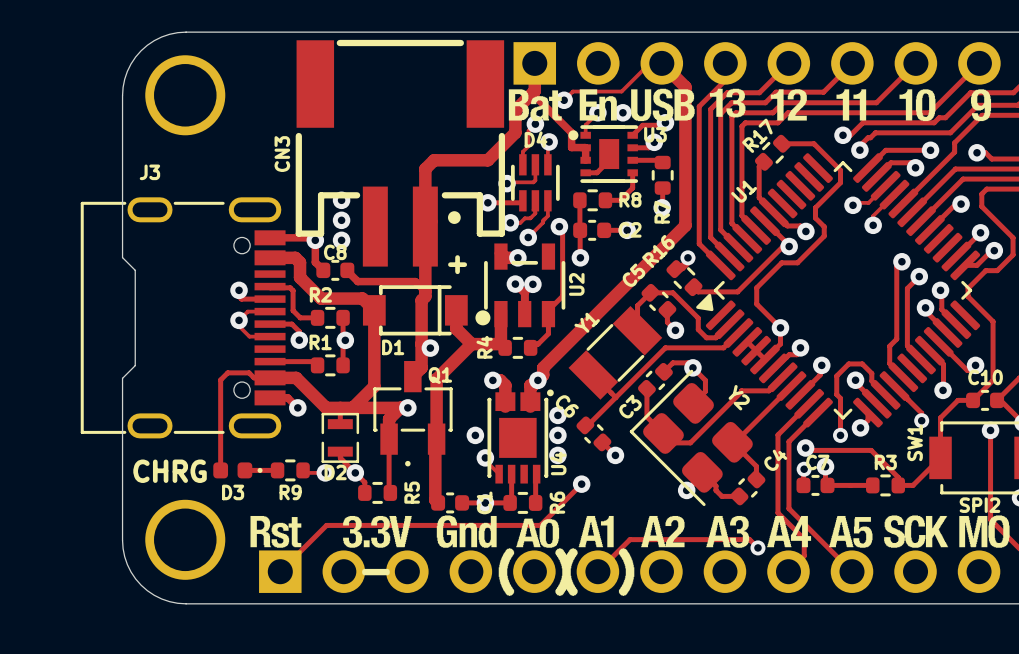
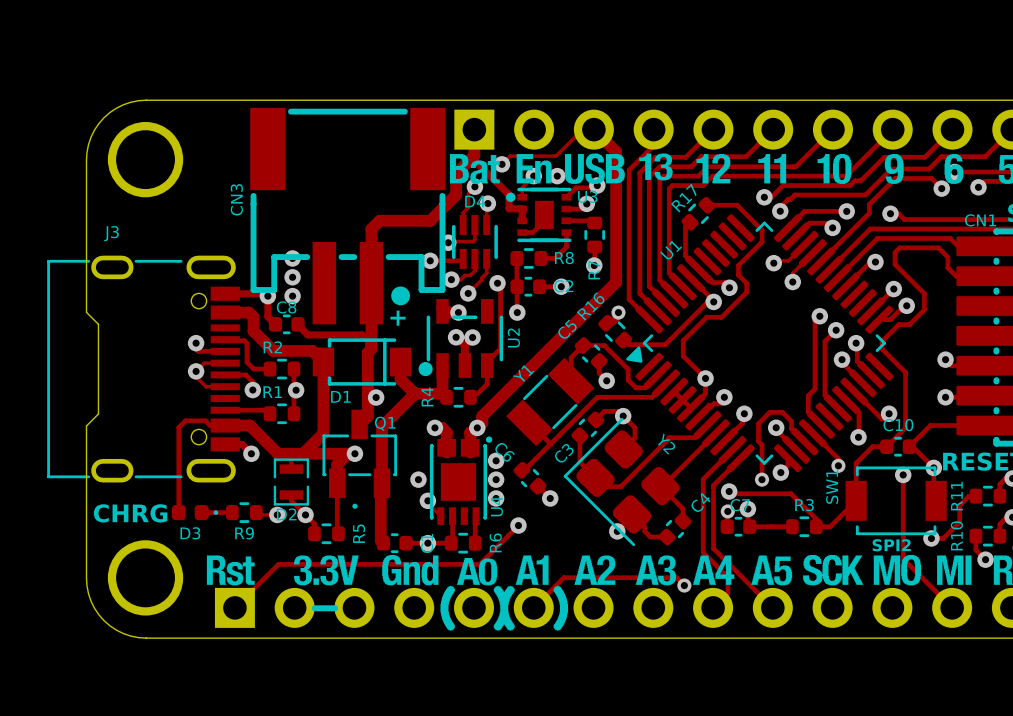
CN3 footprint: [295, 39, 506, 267] -> [250, 107, 446, 325]

